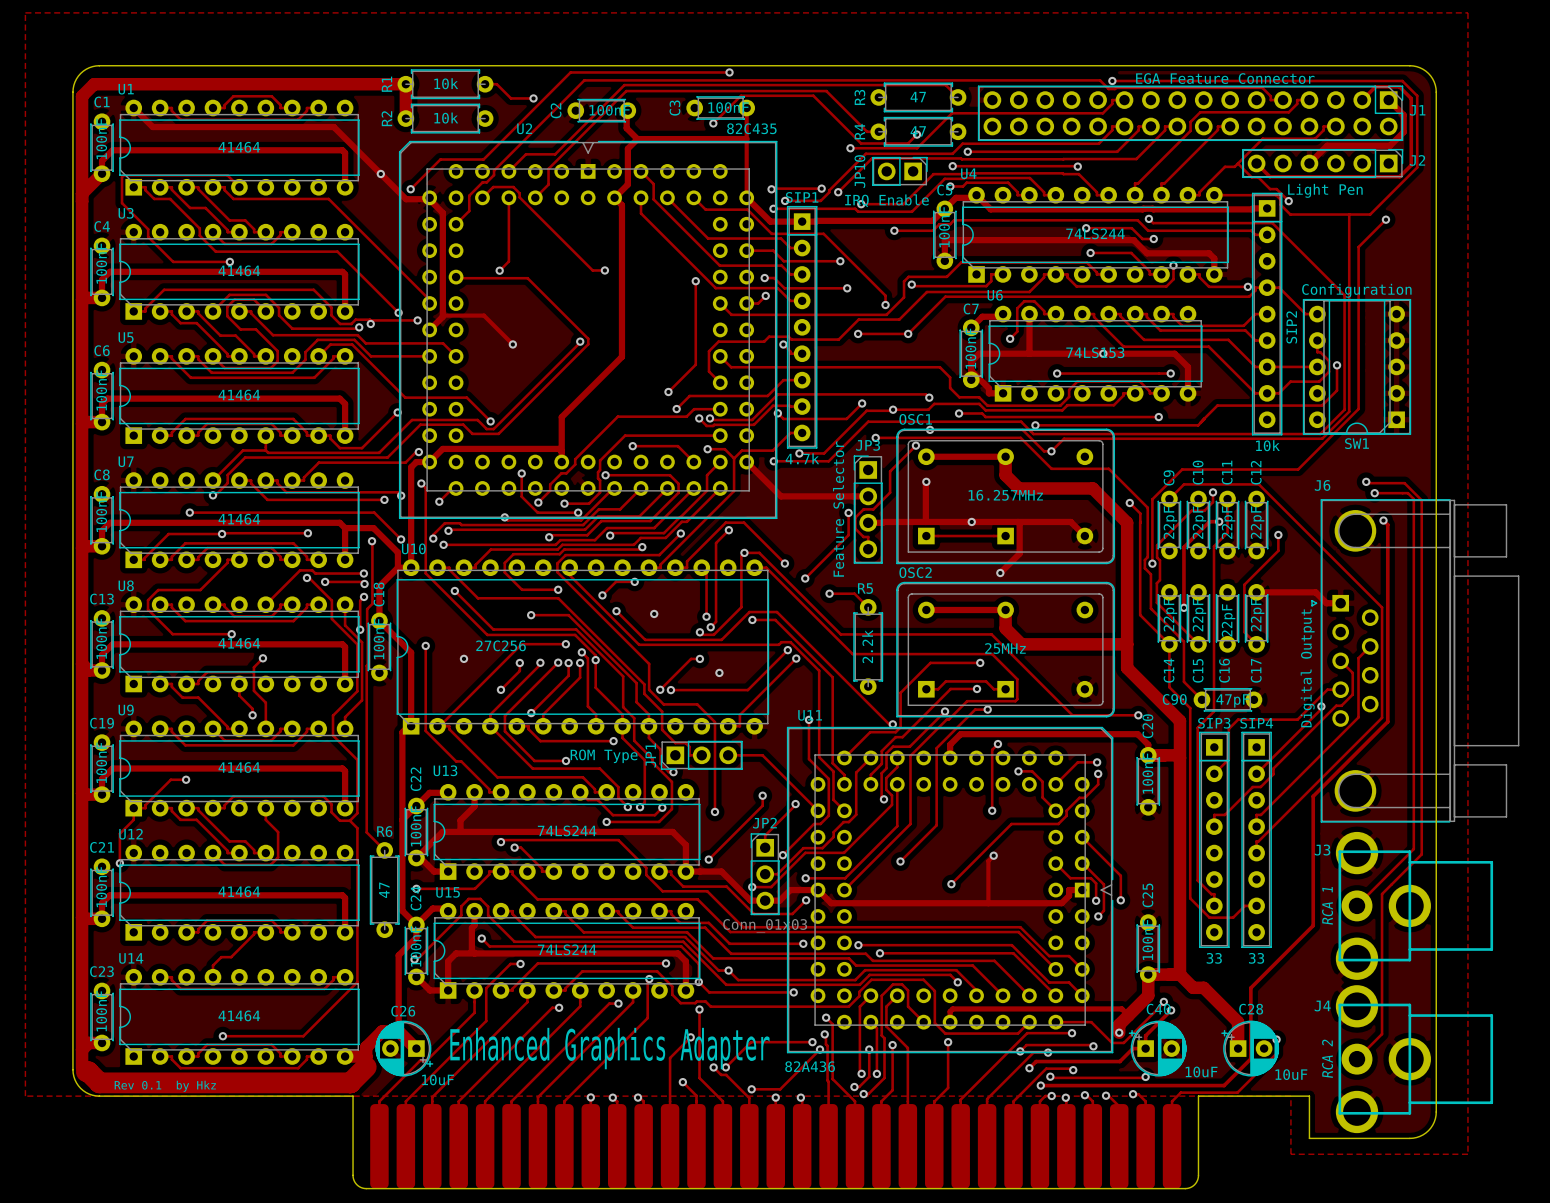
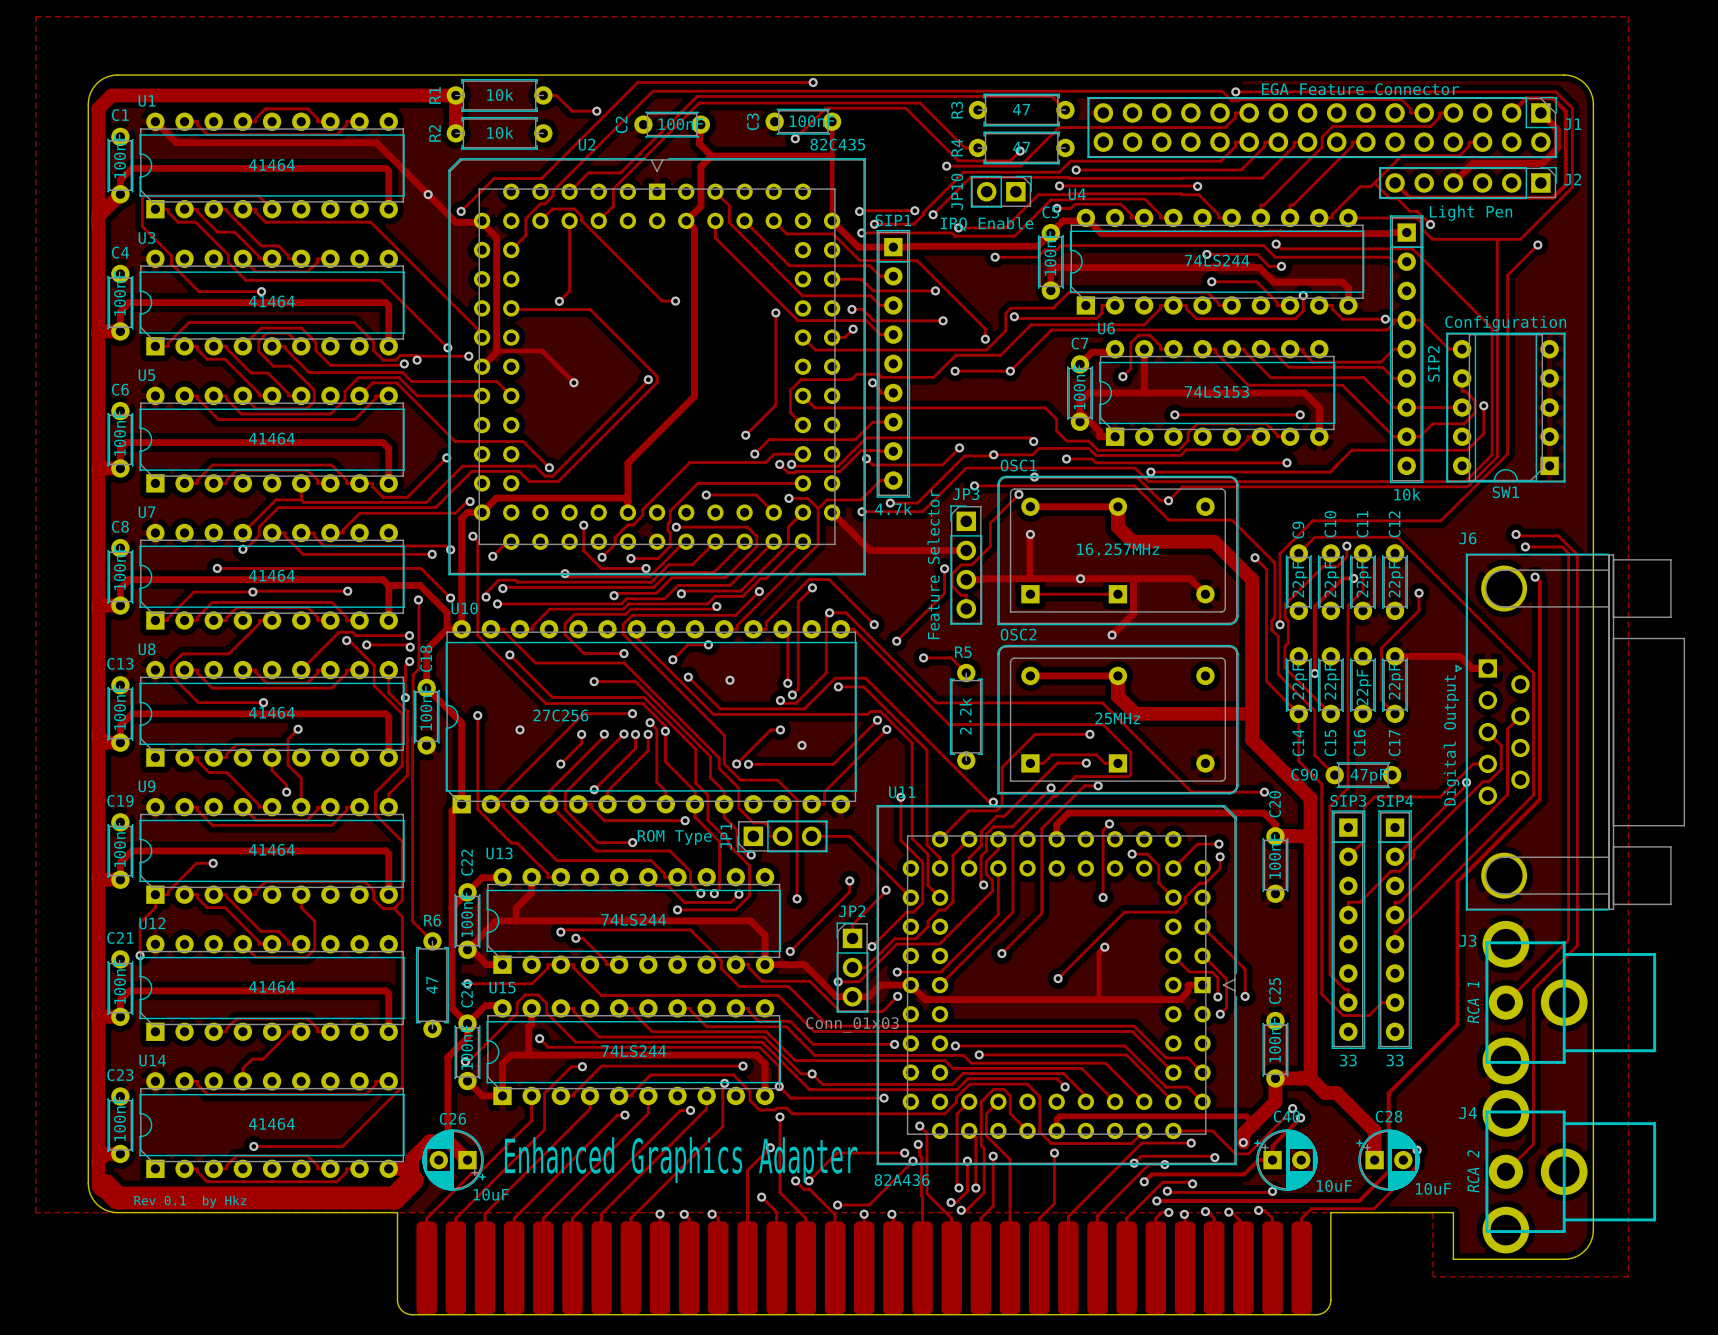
via: (1103, 353) -> none

